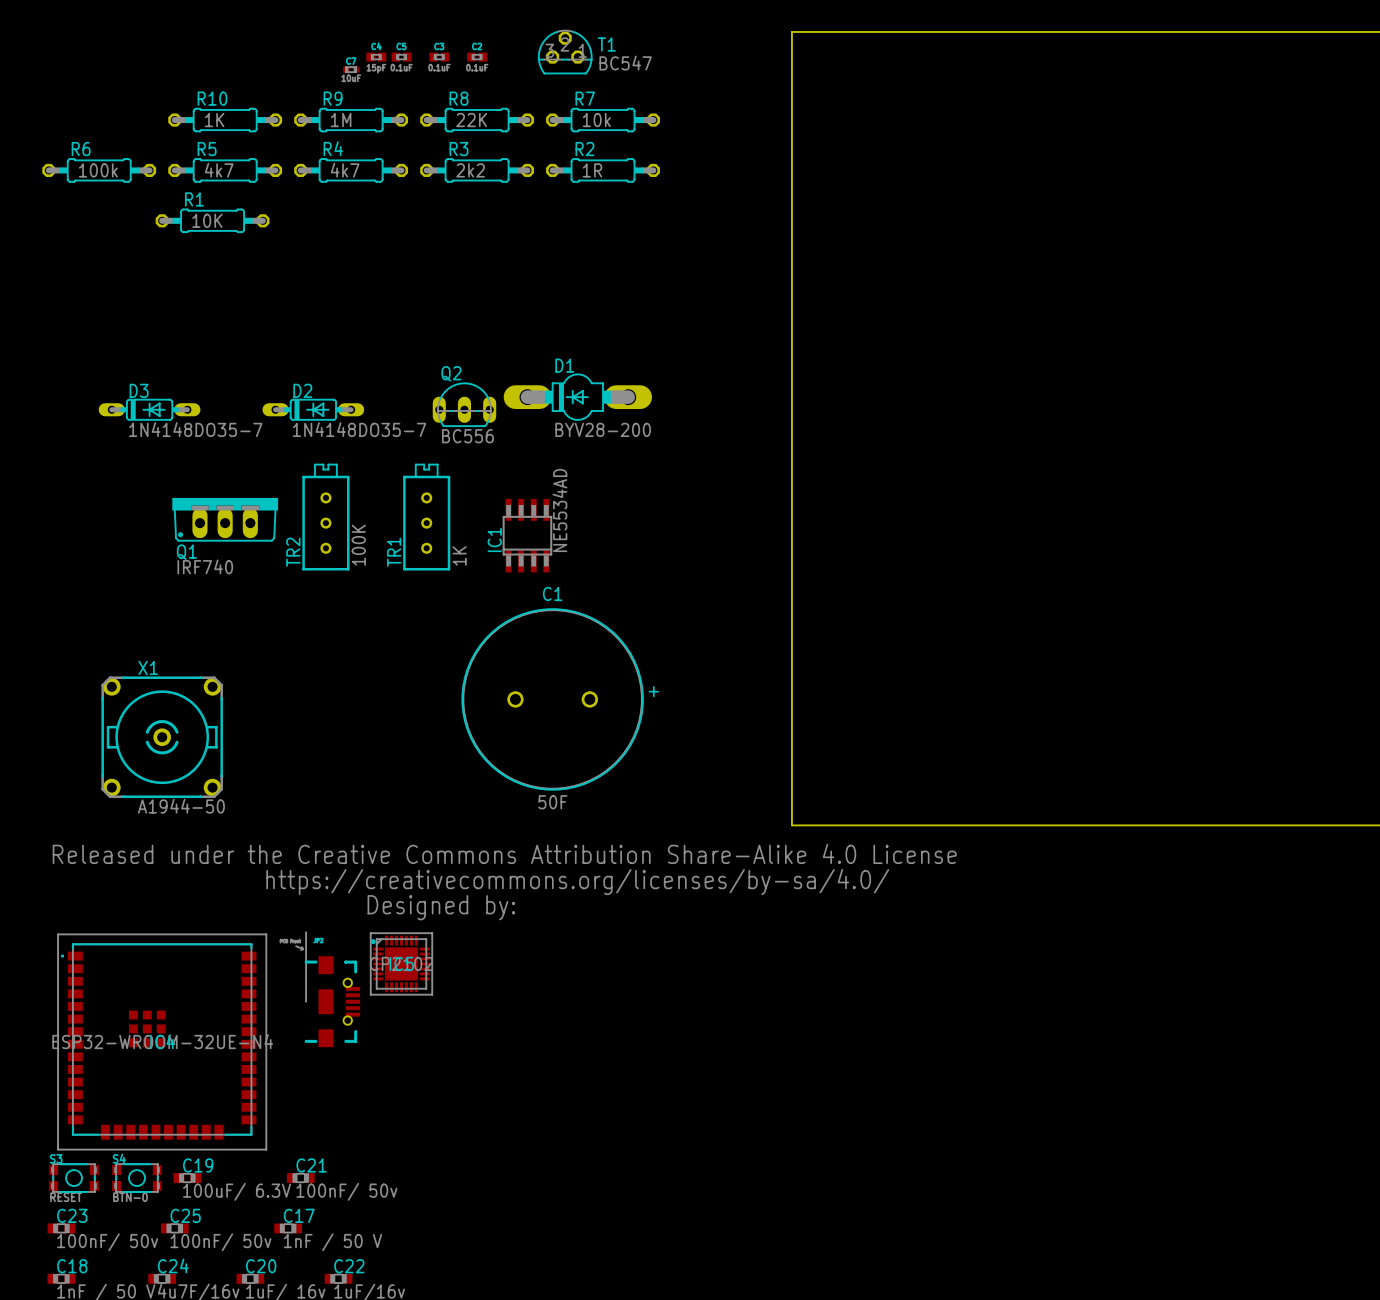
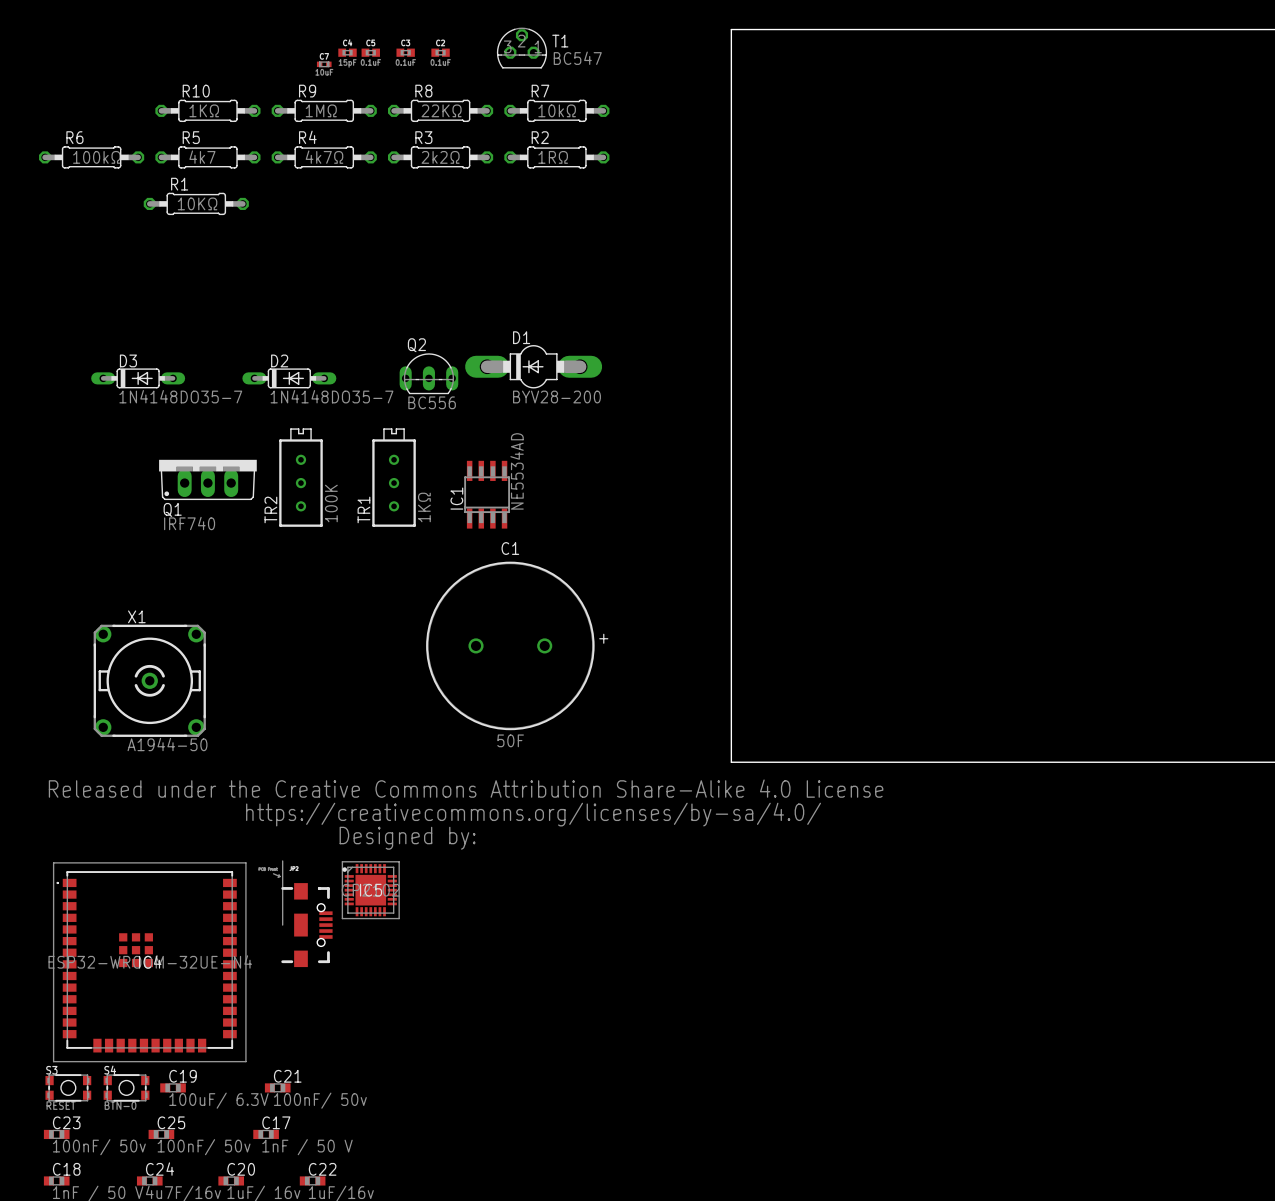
R10 value: 1K (214, 120) -> 1KΩ (204, 110)
R9 value: 1M (341, 120) -> 1MΩ (321, 110)
R8 value: 22K (471, 120) -> 22KΩ (441, 110)
R7 value: 10k (596, 120) -> 10kΩ (557, 110)
R6 value: 100k (98, 170) -> 100kΩ (96, 157)
R4 value: 4k7 (345, 170) -> 4k7Ω (324, 157)
R3 value: 2k2 (470, 170) -> 2k2Ω (440, 157)
R2 value: 1R (592, 170) -> 1RΩ (553, 157)
R1 value: 10K (207, 220) -> 10KΩ (197, 203)
TR1 value: 1K (459, 556) -> 1KΩ (424, 507)

